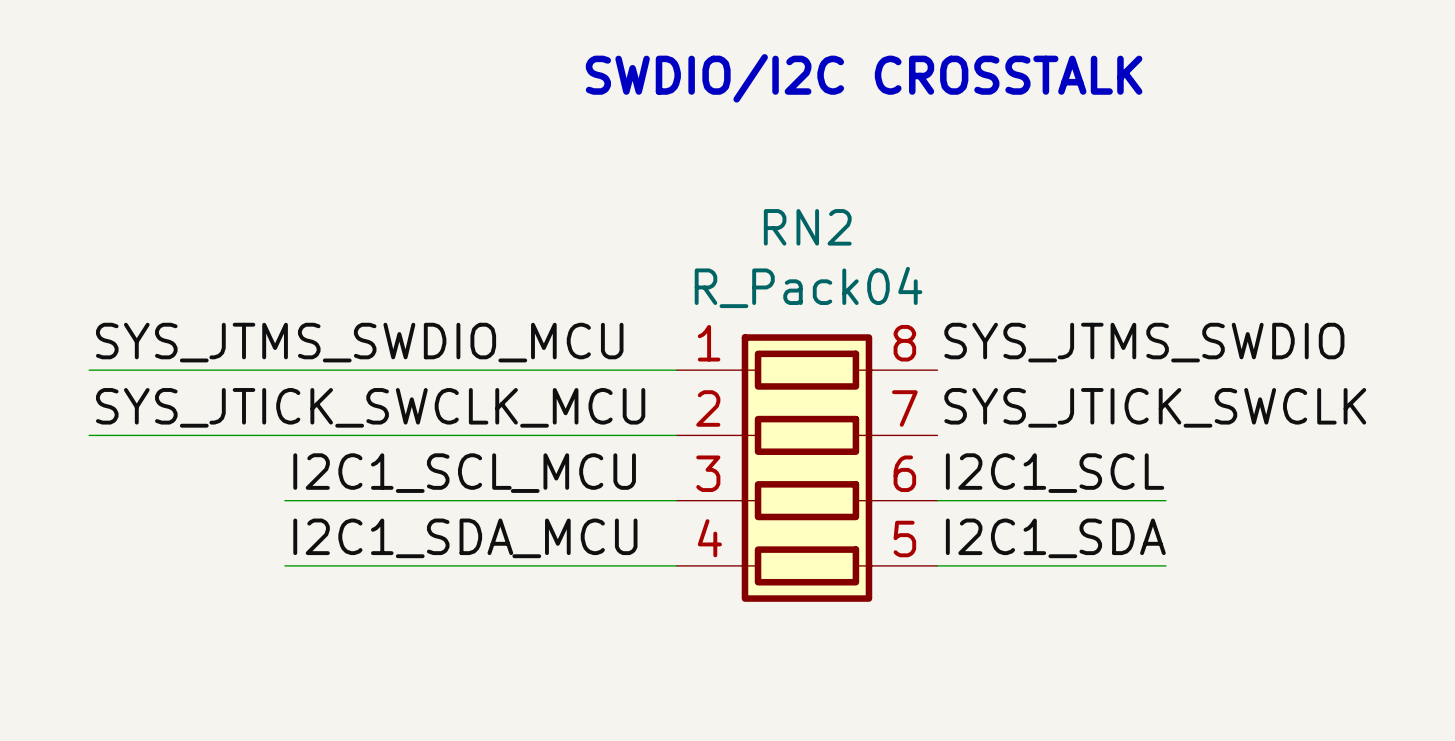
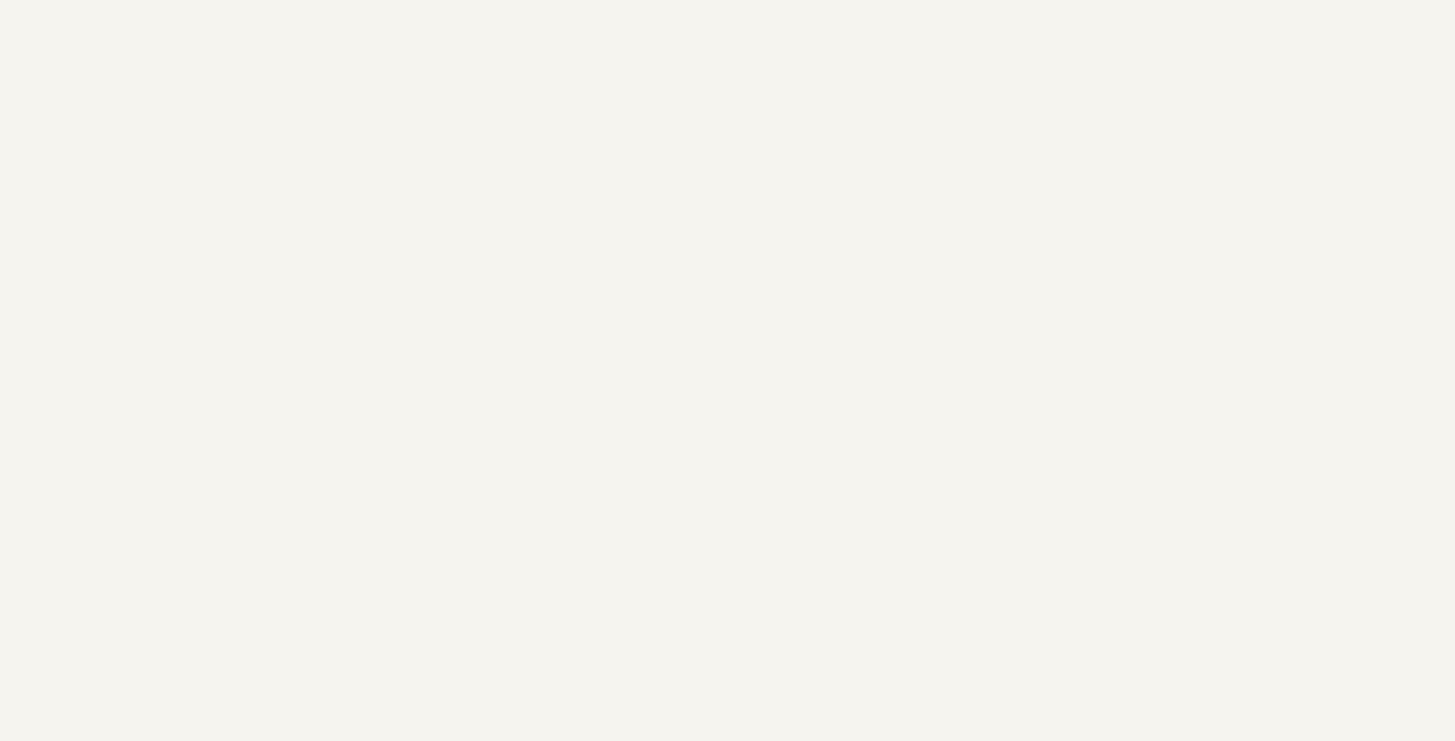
text: SWDIO/I2C CROSSTALK (864, 78) -> none
label: SYS_JTMS_SWDIO_MCU (359, 342) -> none
label: SYS_JTMS_SWDIO (1144, 342) -> none
wire: (89, 370) (676, 370) -> none
label: SYS_JTICK_SWCLK_MCU (370, 407) -> none
label: SYS_JTICK_SWCLK (1155, 407) -> none
wire: (89, 435) (676, 435) -> none
RN2: R_Pack04 (806, 468) -> none
label: I2C1_SCL_MCU (464, 473) -> none
label: I2C1_SCL (1055, 473) -> none
wire: (284, 500) (676, 500) -> none
wire: (937, 500) (1165, 500) -> none
label: I2C1_SDA_MCU (465, 538) -> none
label: I2C1_SDA (1055, 538) -> none
wire: (284, 565) (676, 565) -> none
wire: (937, 565) (1165, 565) -> none

